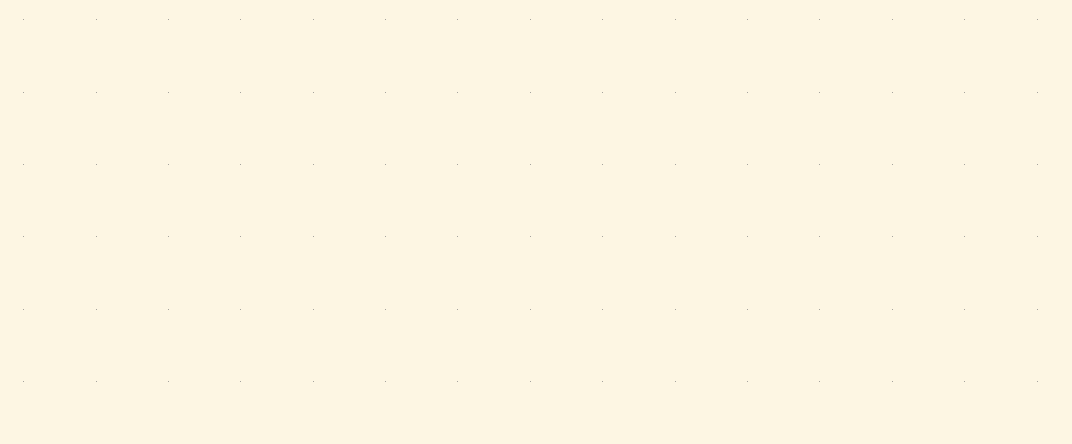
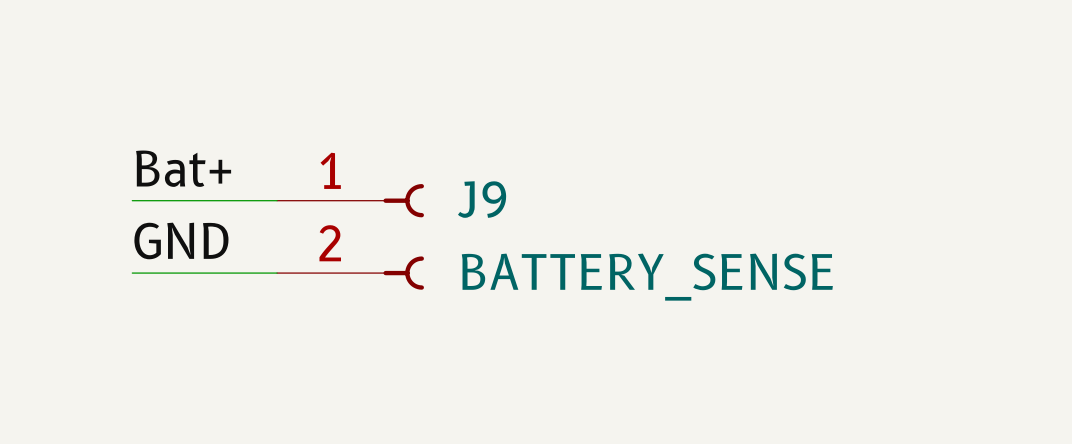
label: none -> Bat+ (183, 168)
wire: none -> (132, 200) (277, 200)
J9: none -> BATTERY_SENSE (350, 236)
label: none -> GND (181, 240)
wire: none -> (132, 273) (277, 273)

